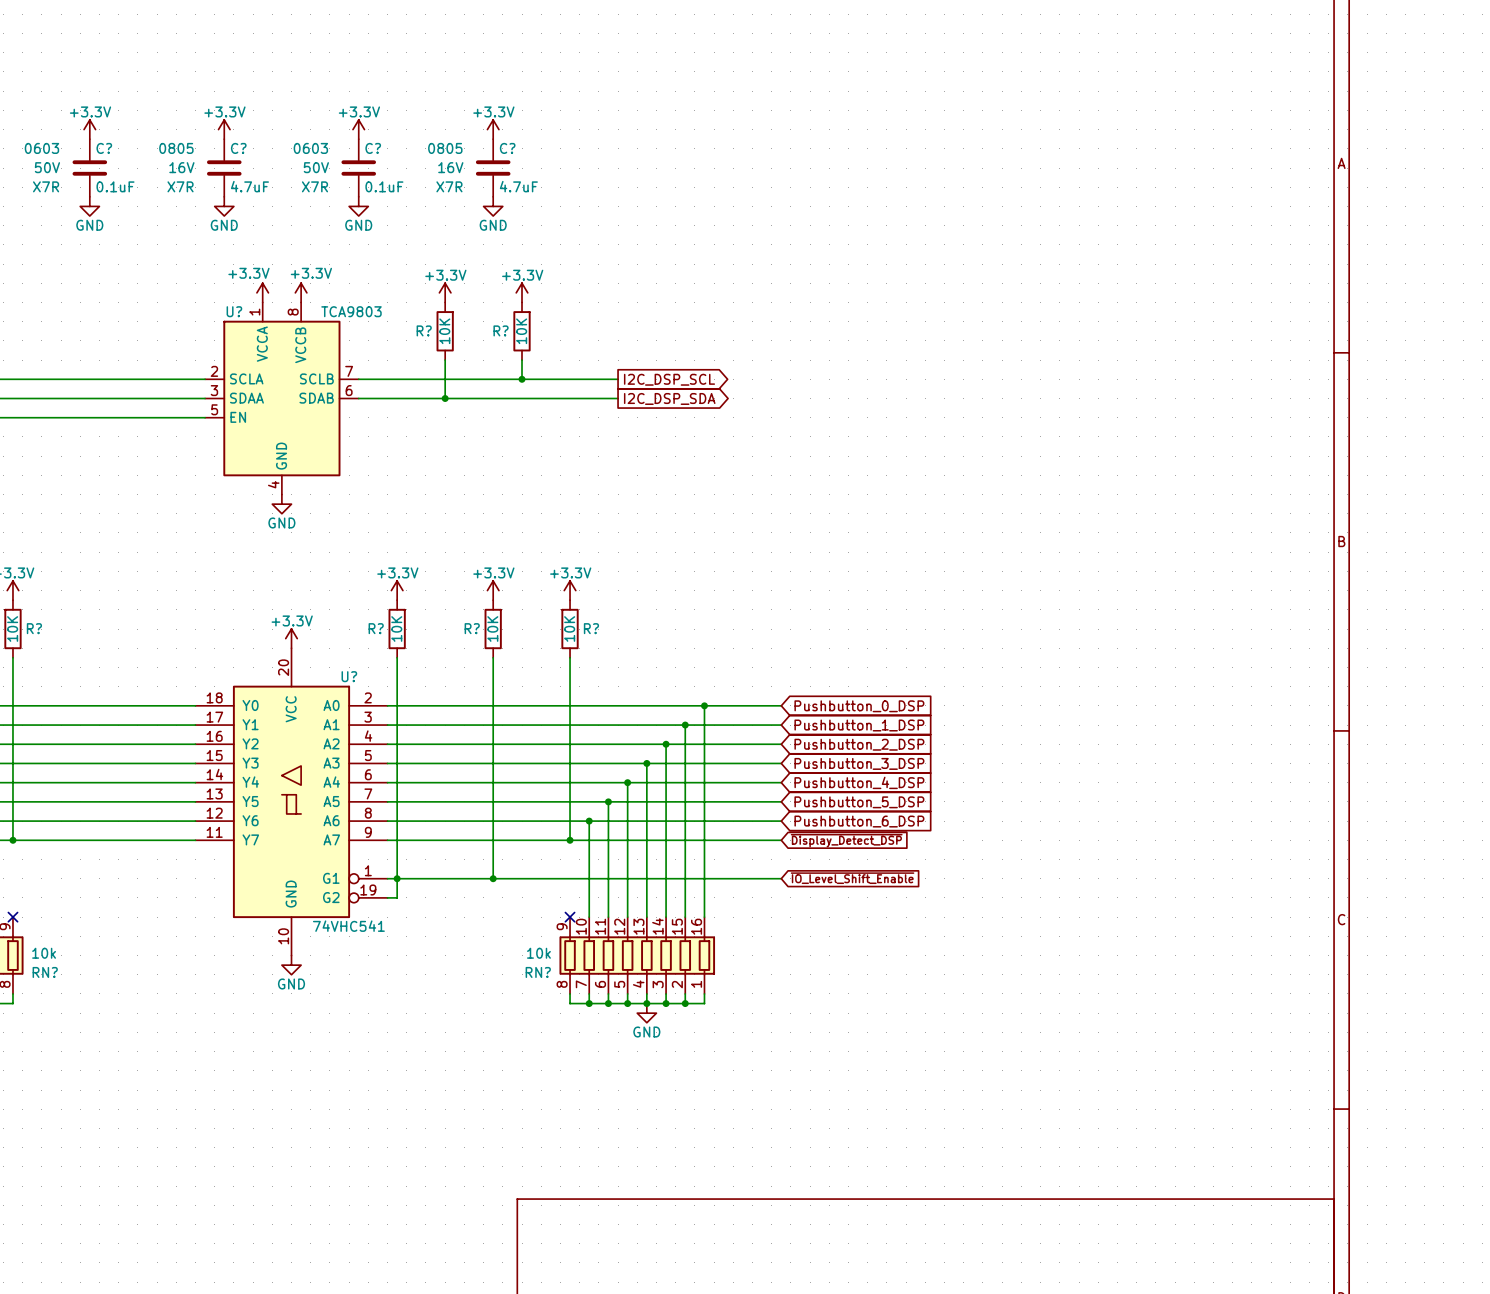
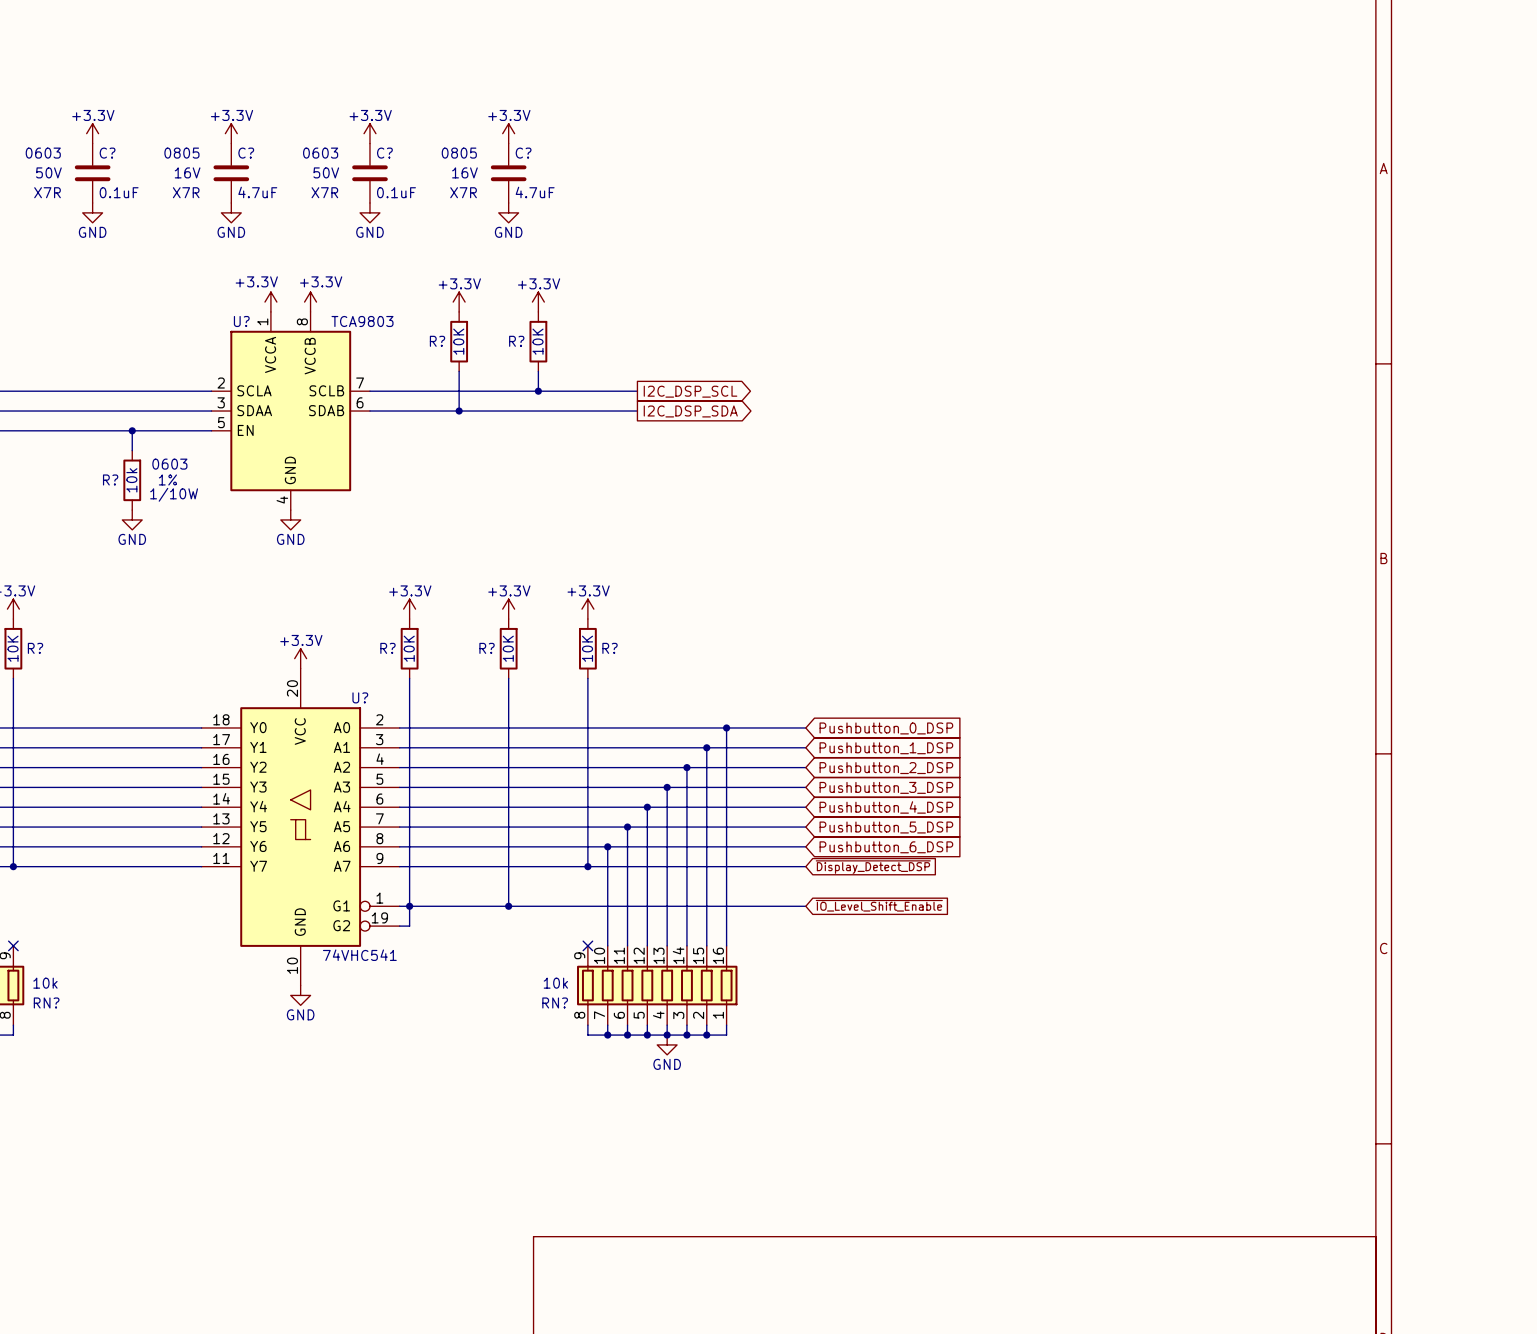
wire: none -> (132, 430) (132, 450)
junction: none -> (132, 430)
R?: none -> 10k (132, 480)
power symbol: none -> GND (132, 519)

